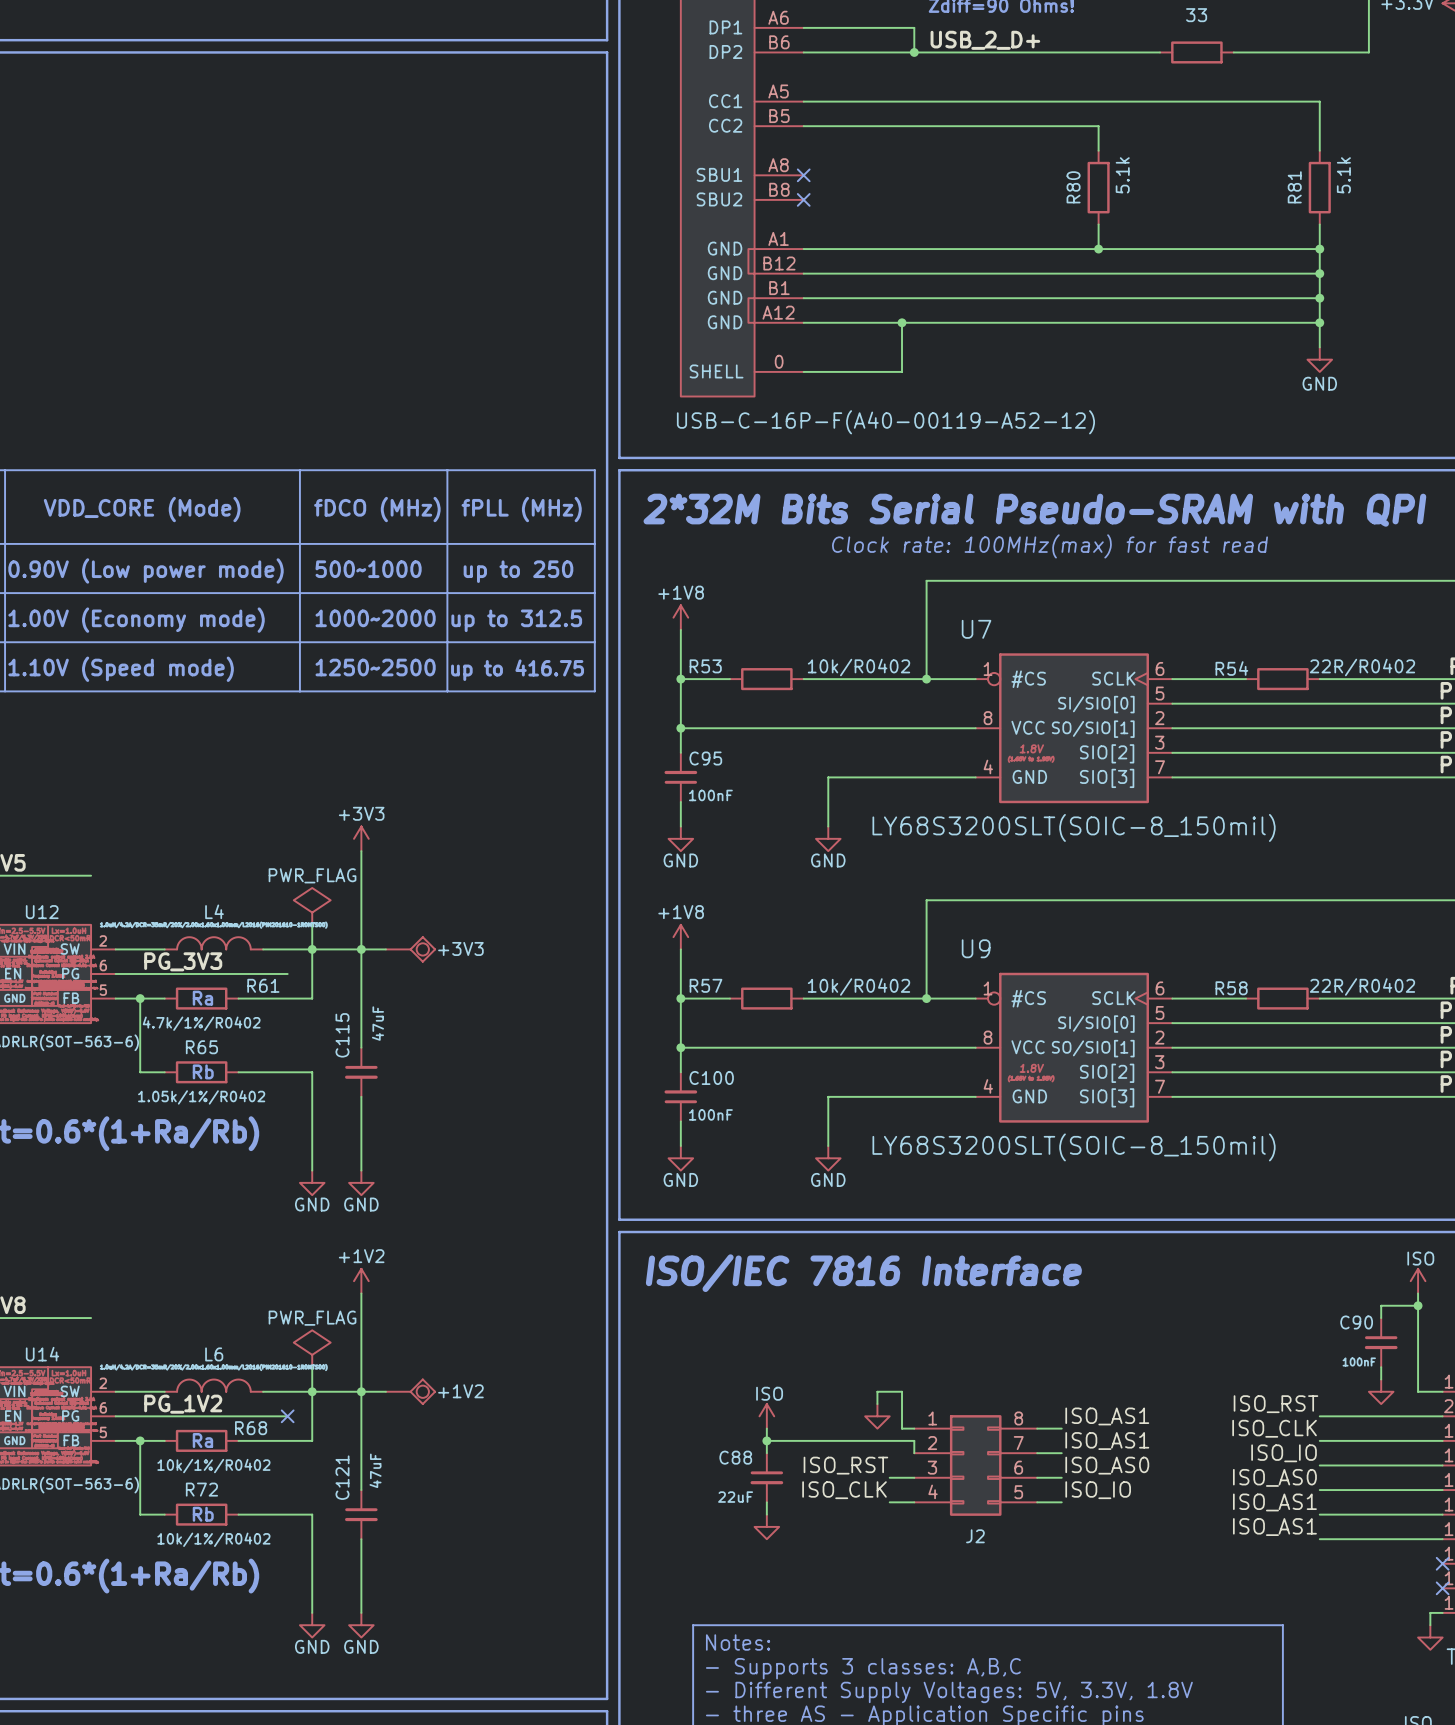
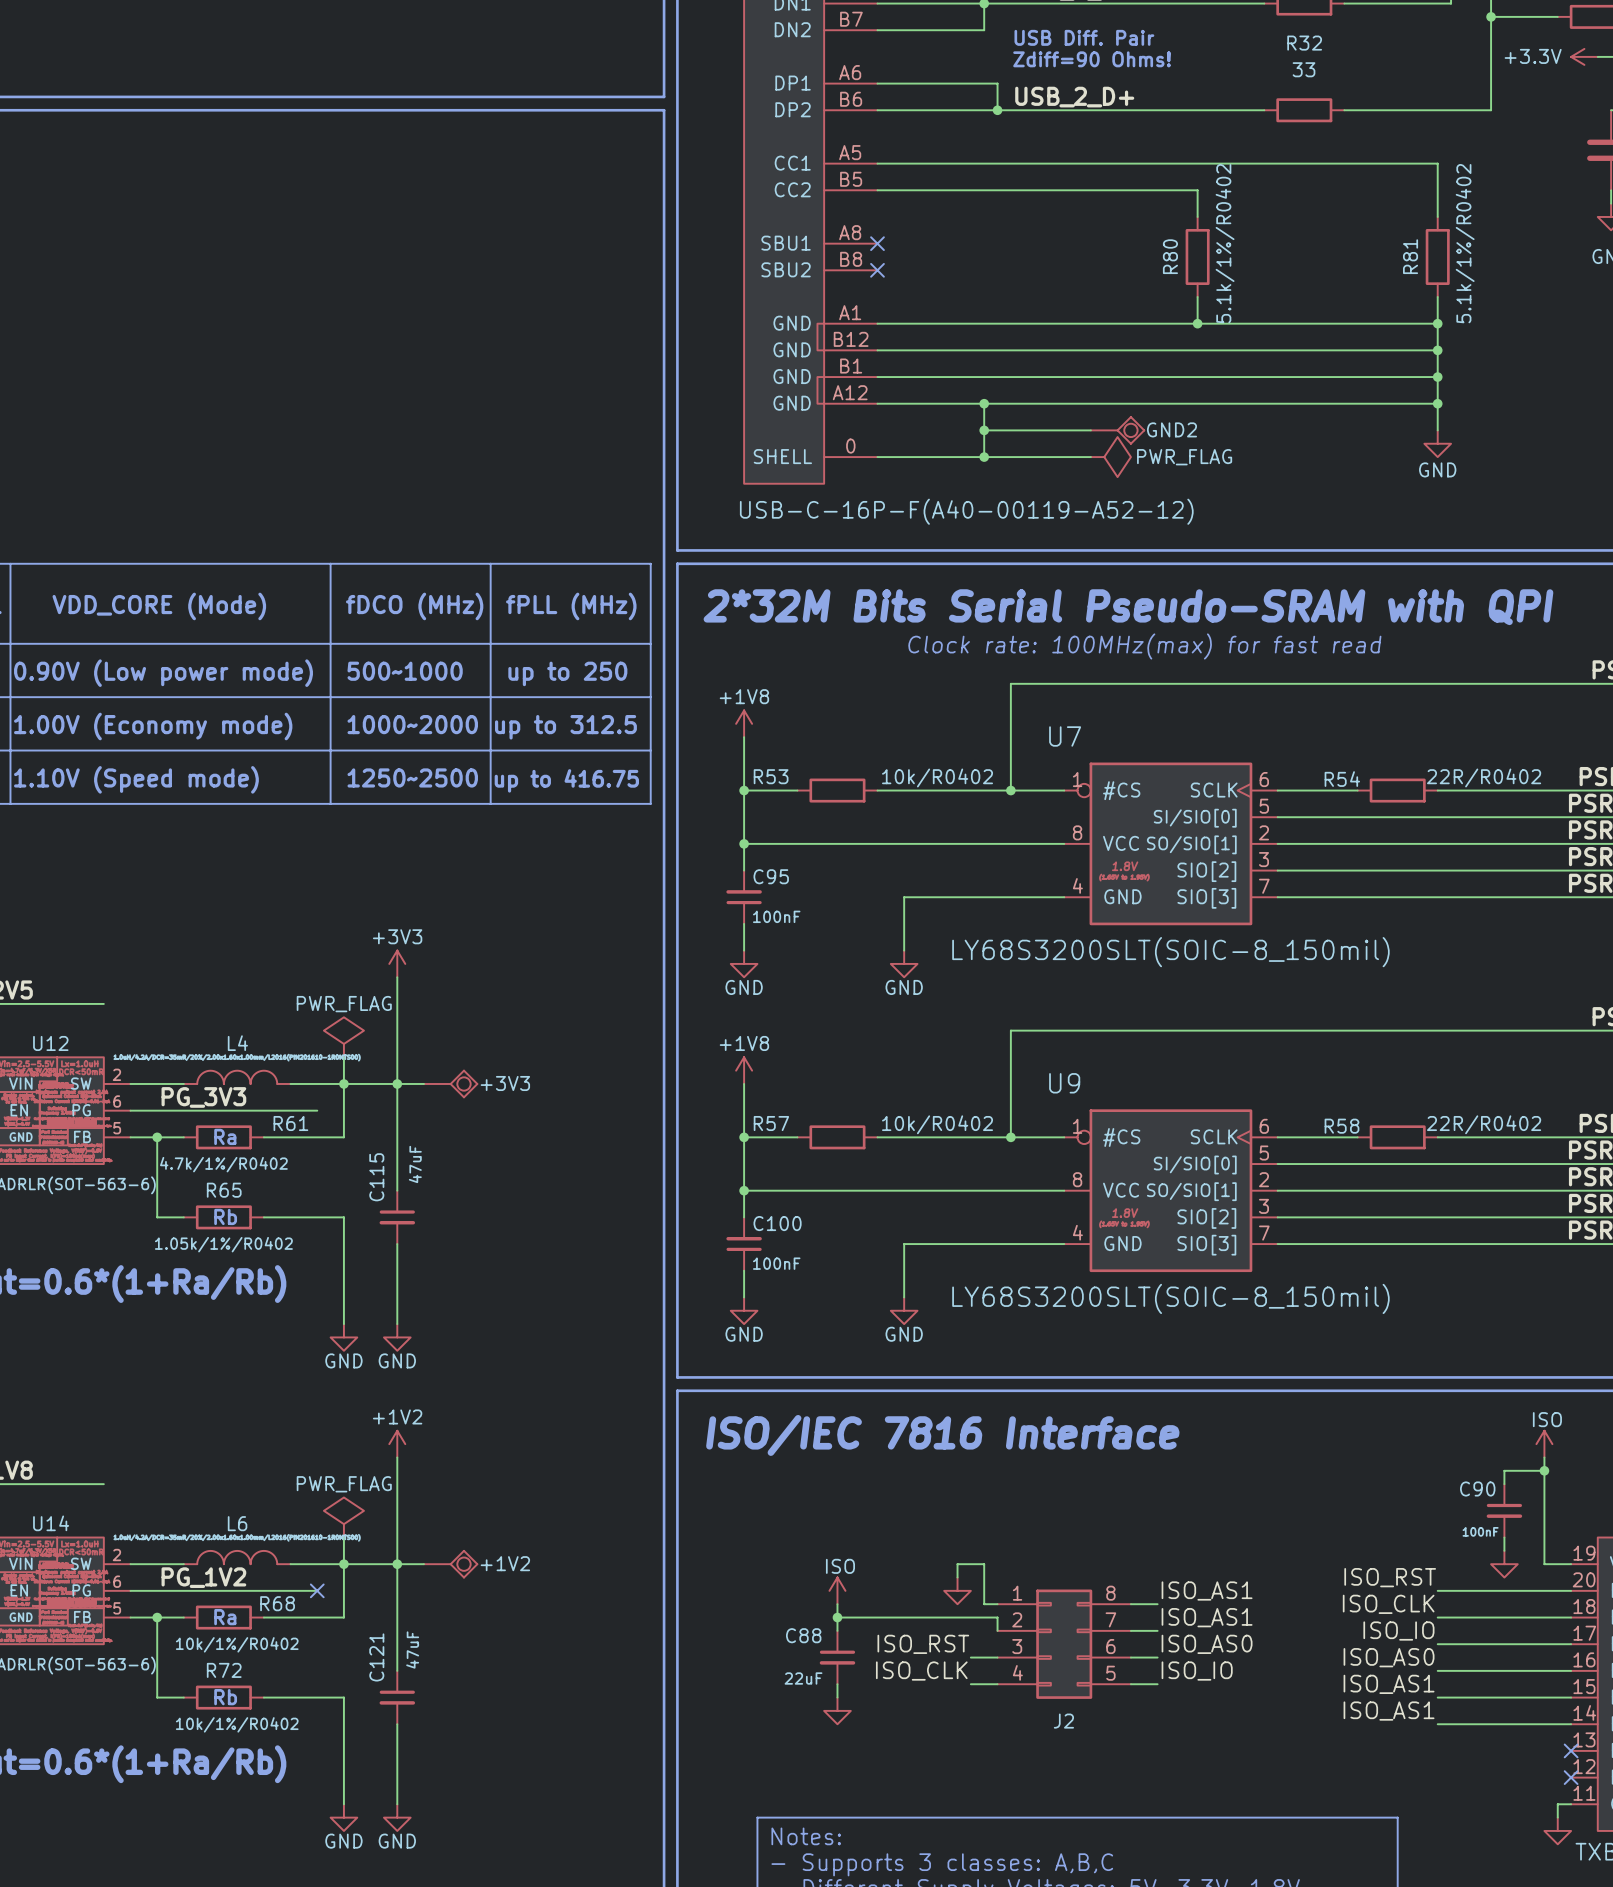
R80 value: 5.1k (1122, 175) -> 5.1k/1%/R0402 (1225, 243)
R81 value: 5.1k (1343, 175) -> 5.1k/1%/R0402 (1465, 243)
wire: none -> (984, 430) (1090, 430)
junction: none -> (984, 430)
GND2: none -> (1117, 430)
wire: none -> (984, 457) (1090, 457)
junction: none -> (984, 457)
power symbol: none -> PWR_FLAG (1110, 457)

